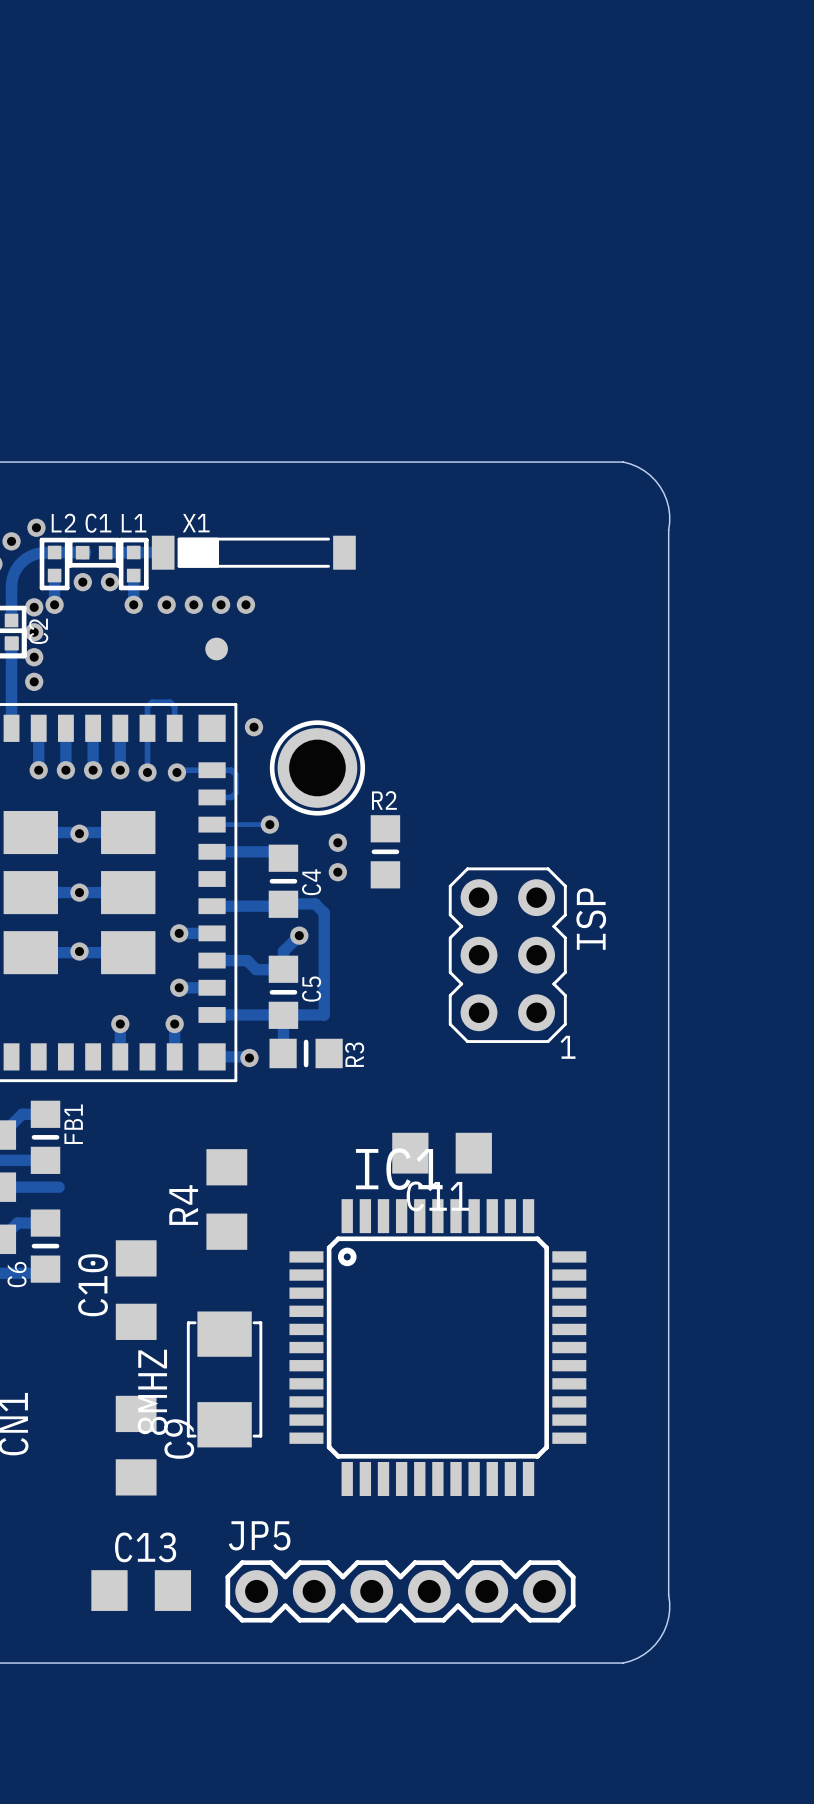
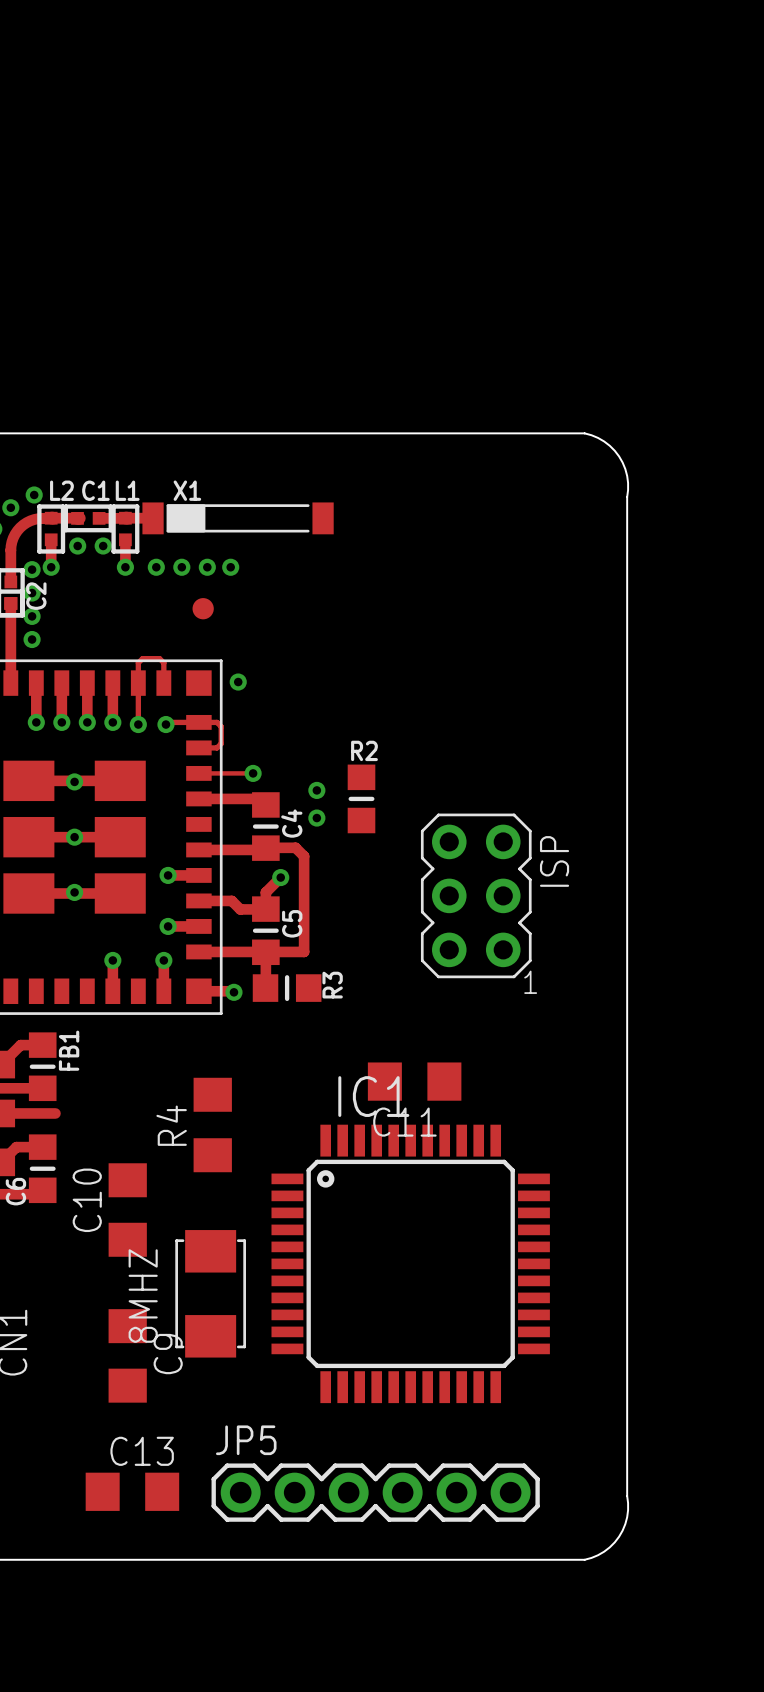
part: (317, 767) -> none

